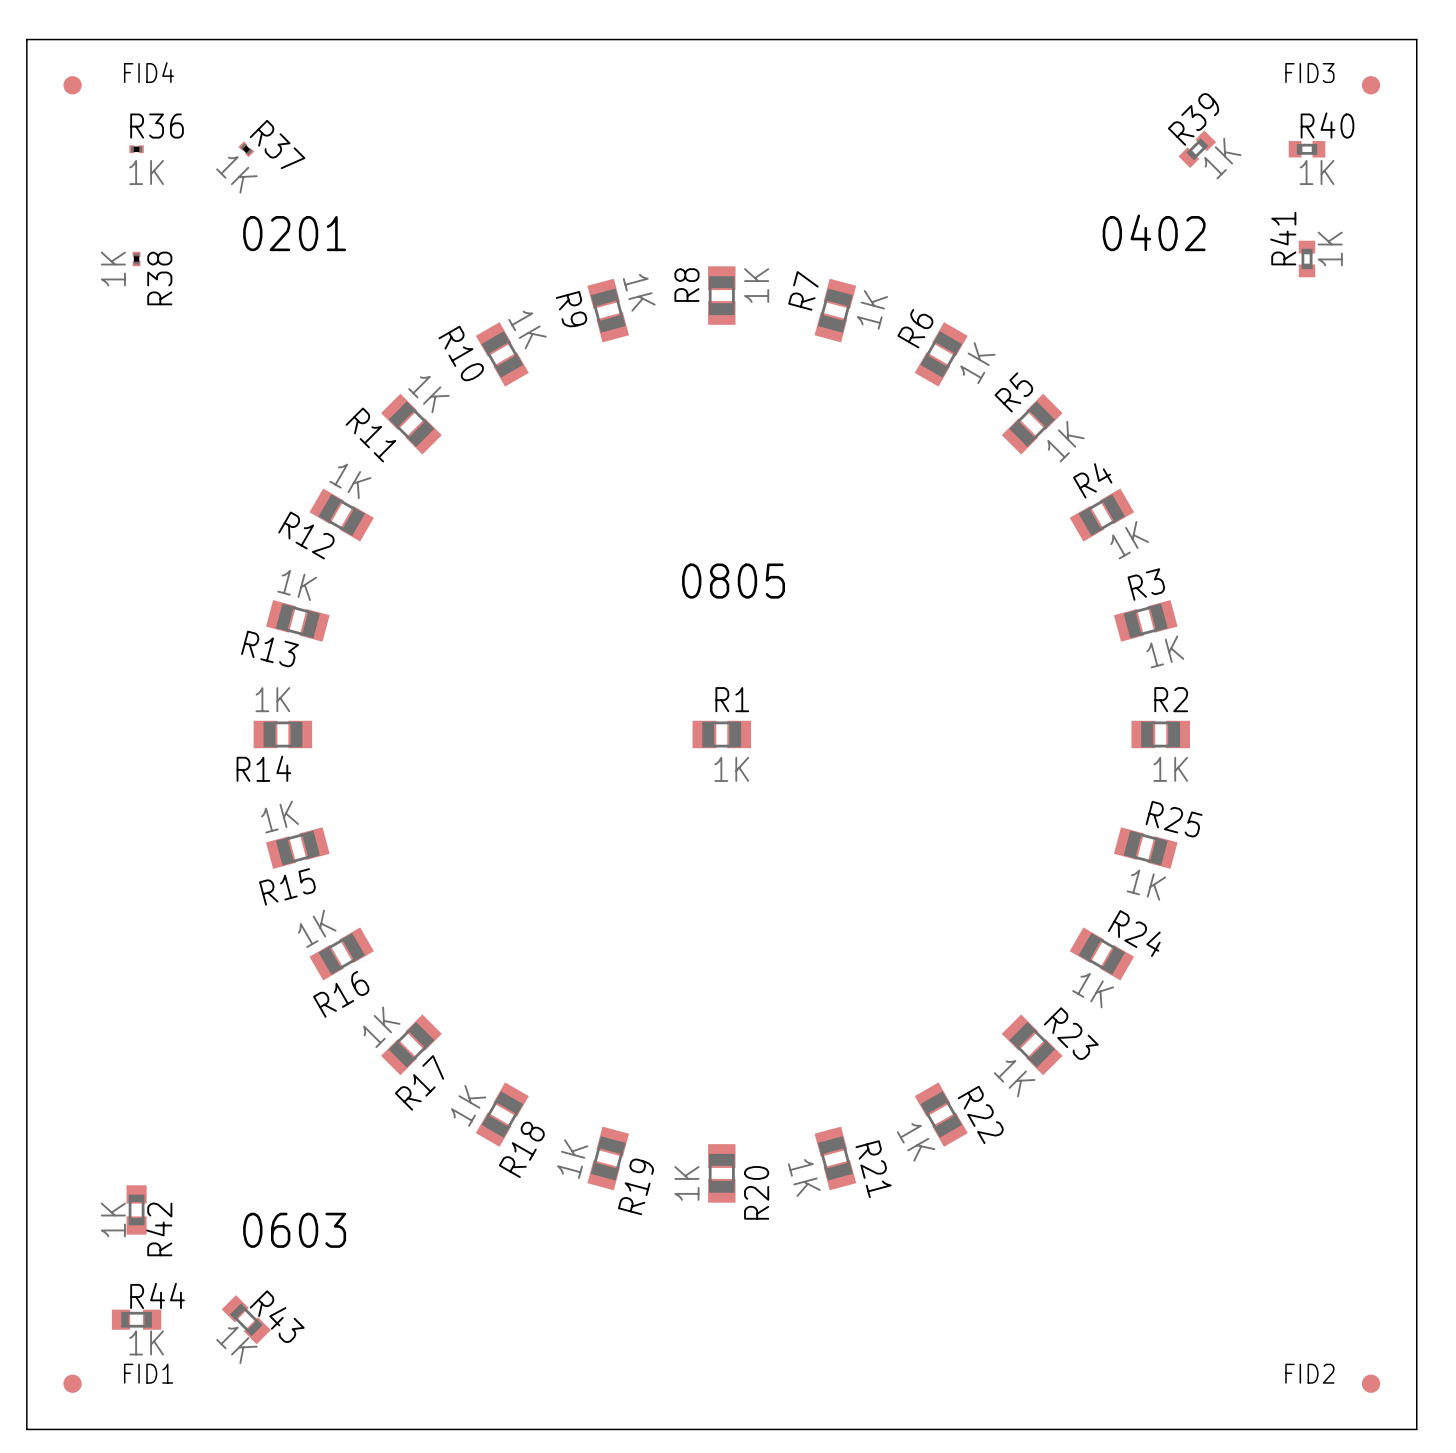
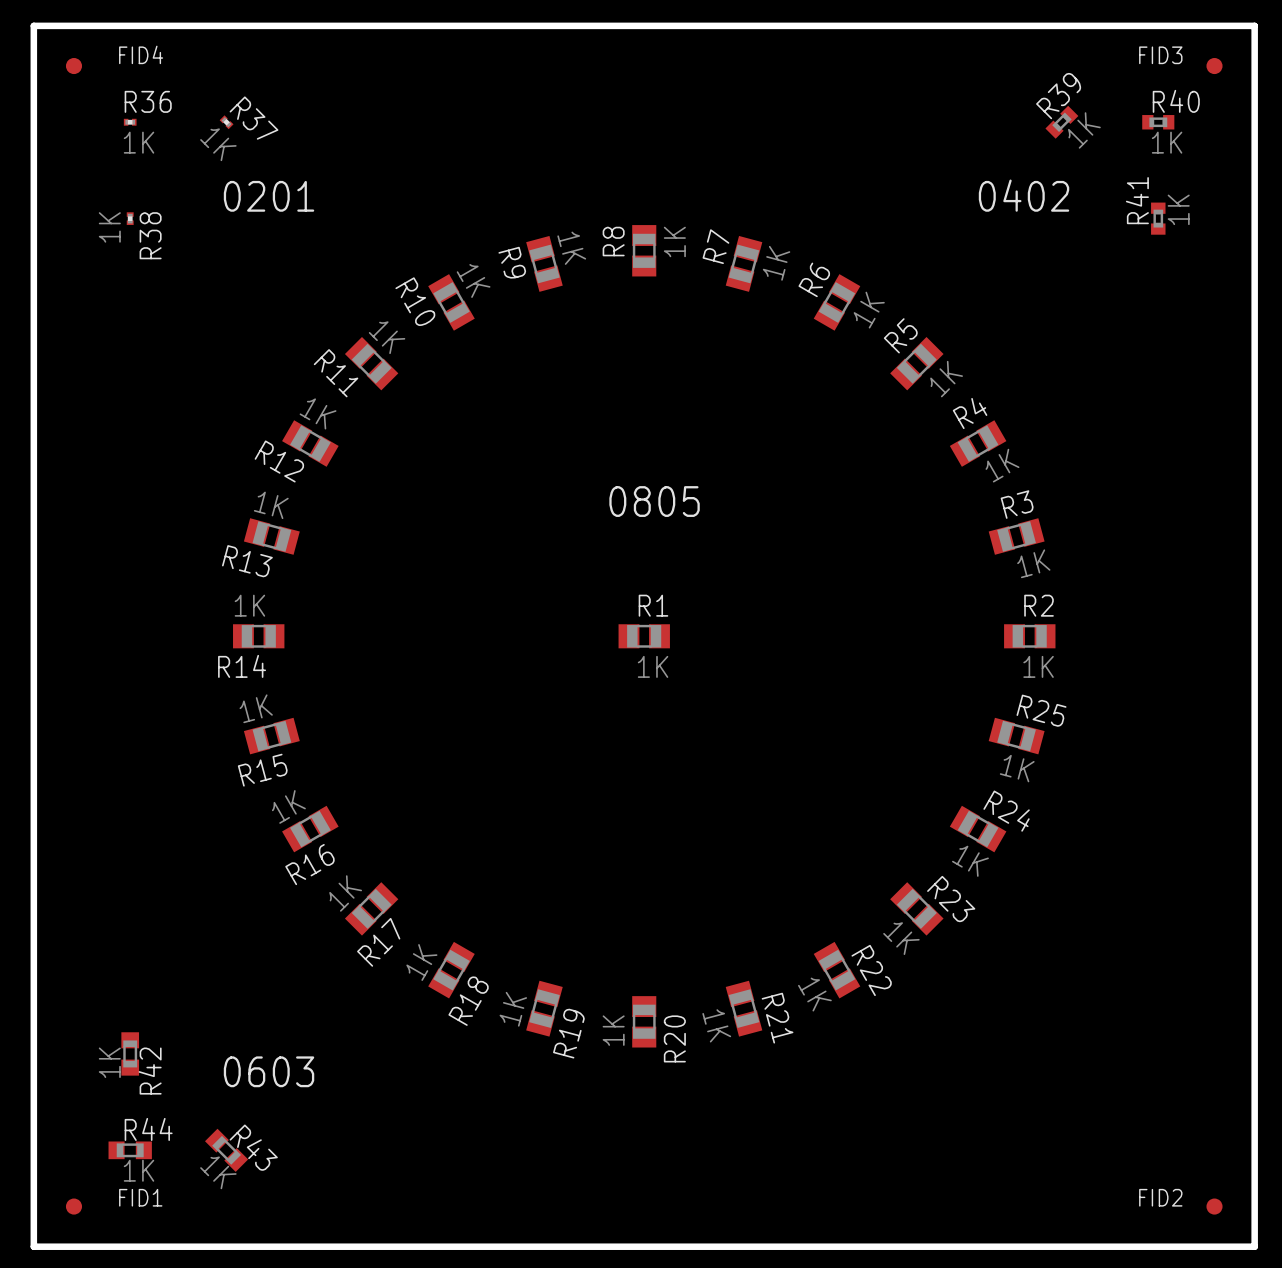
board edge width: thin (26, 39) (26, 1429) (1416, 1429) (1416, 39) (26, 39) -> thick (33, 25) (33, 1246) (1254, 1246) (1254, 25) (33, 25)

